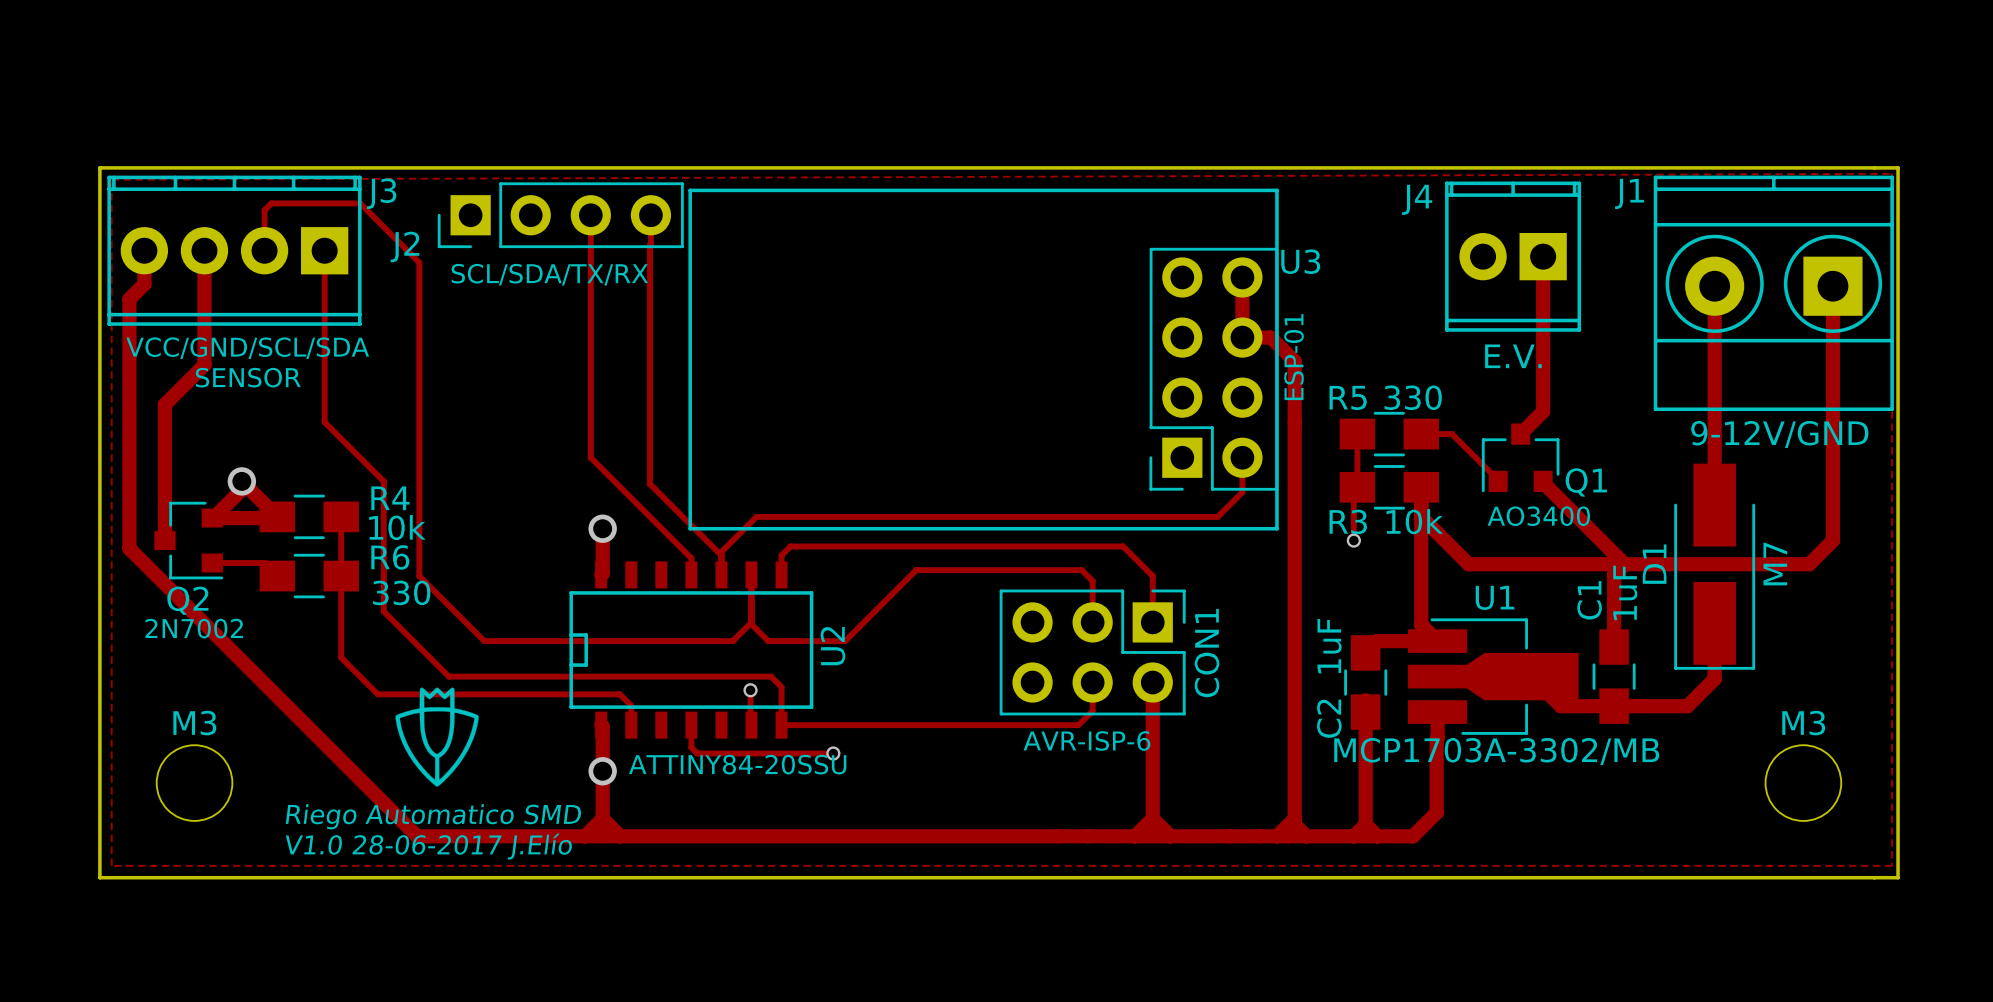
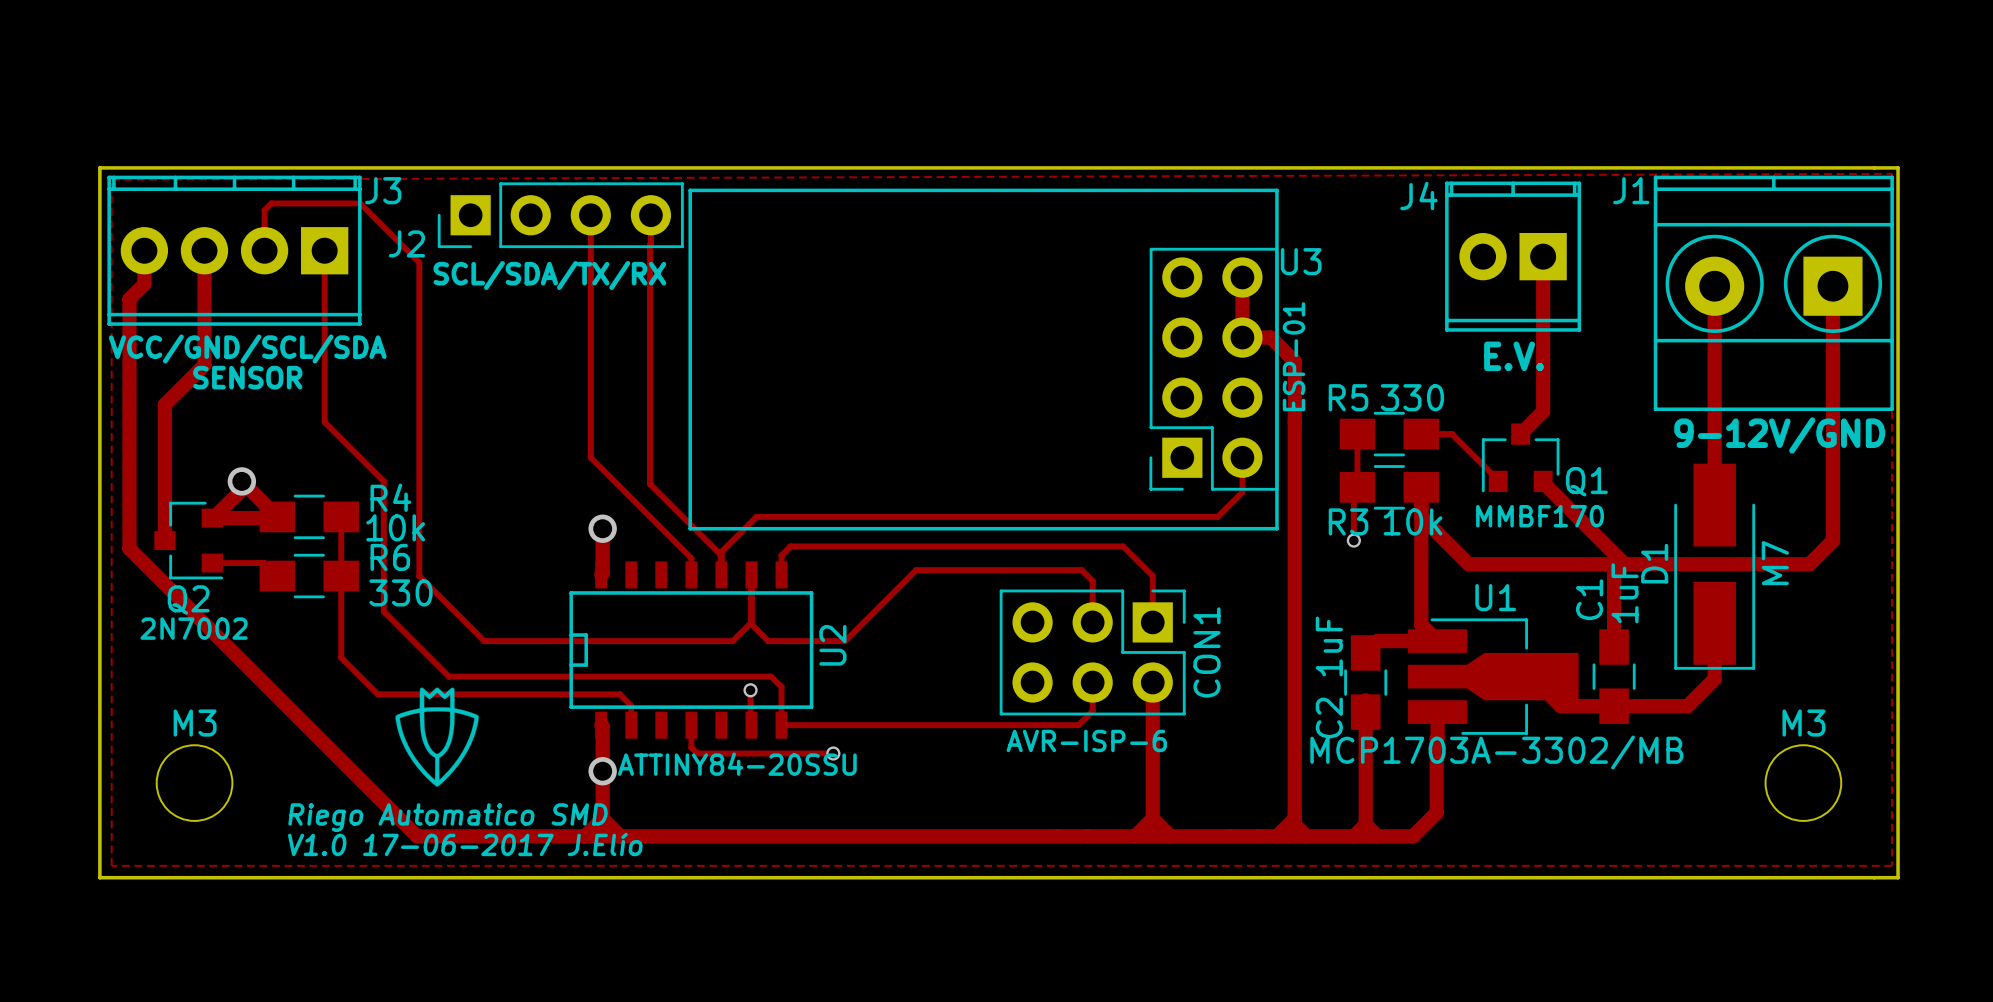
Q1 value: AO3400 (1538, 516) -> MMBF170 (1540, 516)
text: V1.0 28-06-2017 J.Elío (429, 846) -> V1.0 17-06-2017 J.Elío (465, 844)

